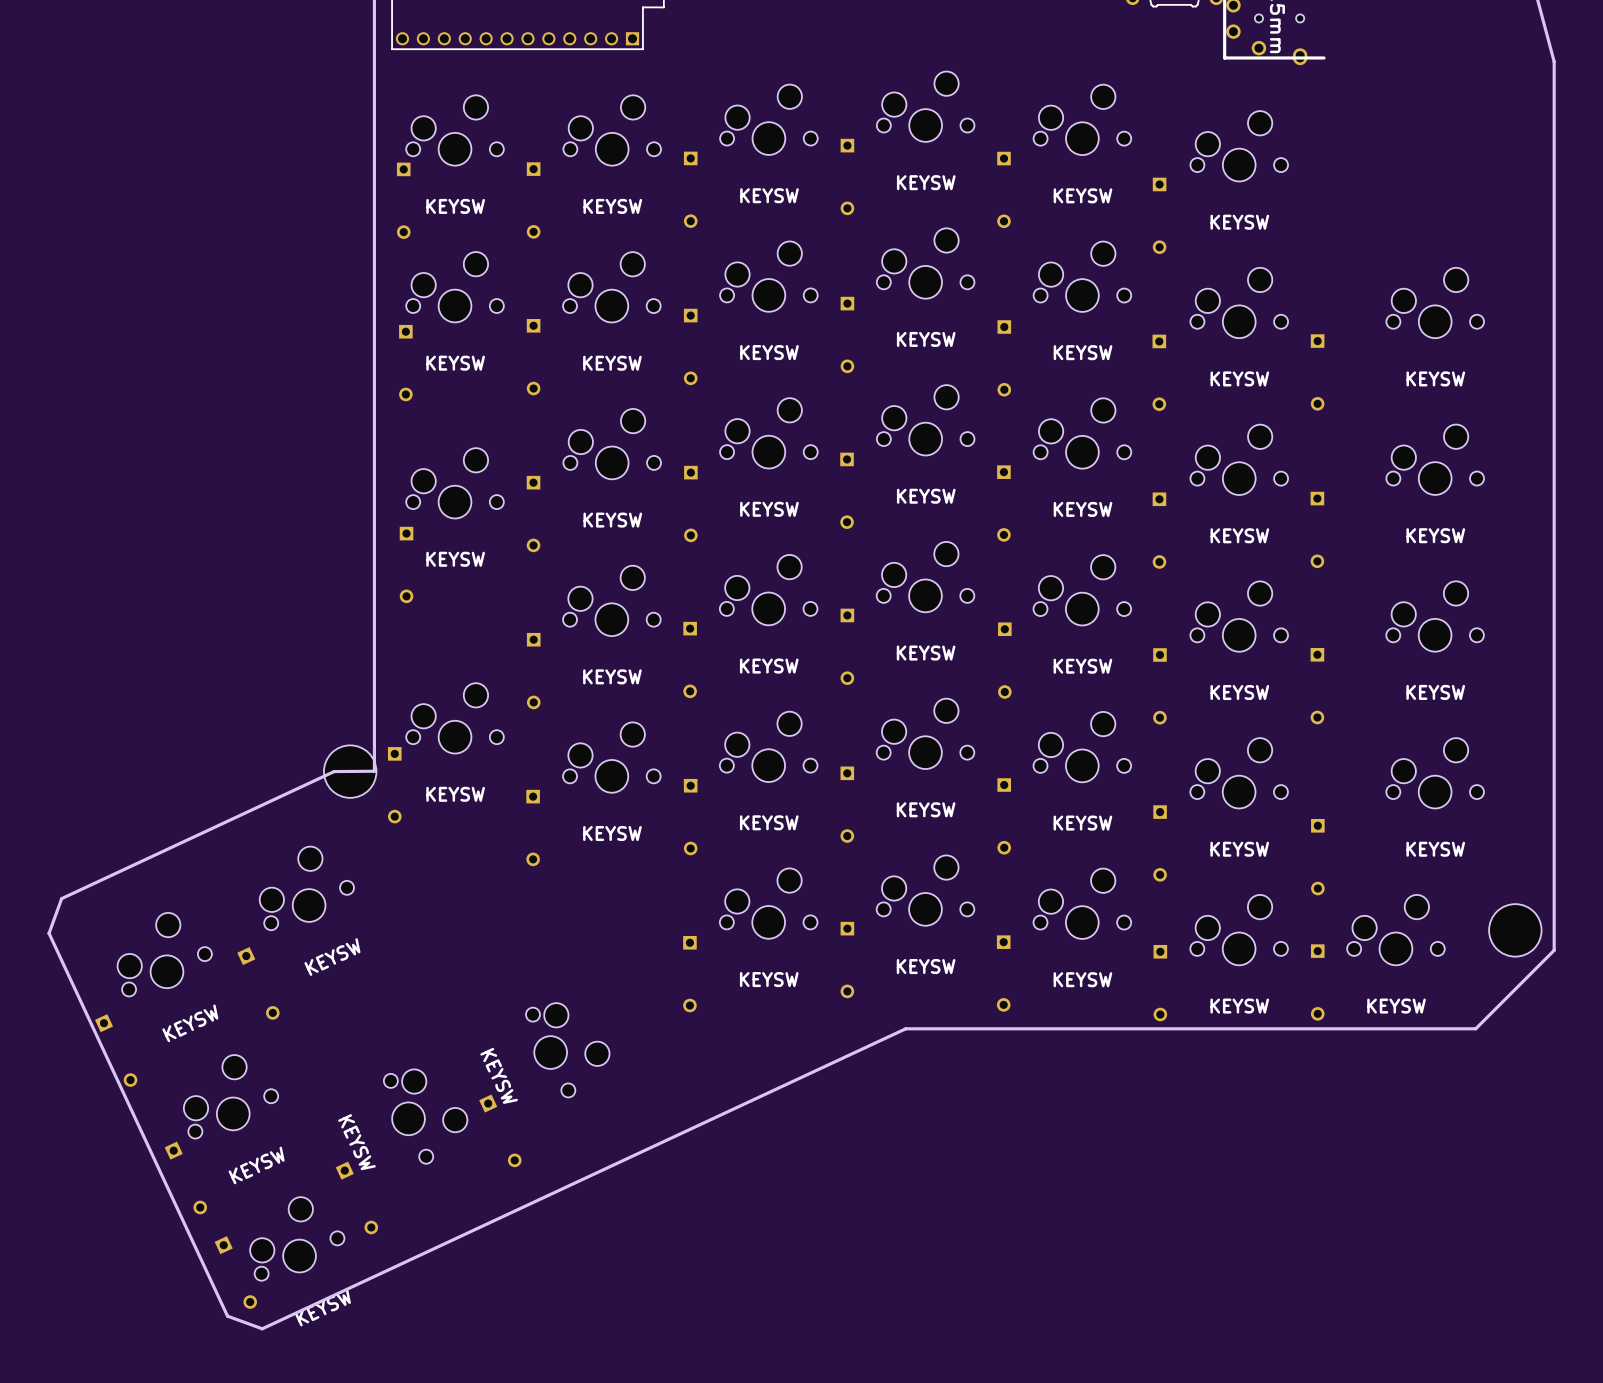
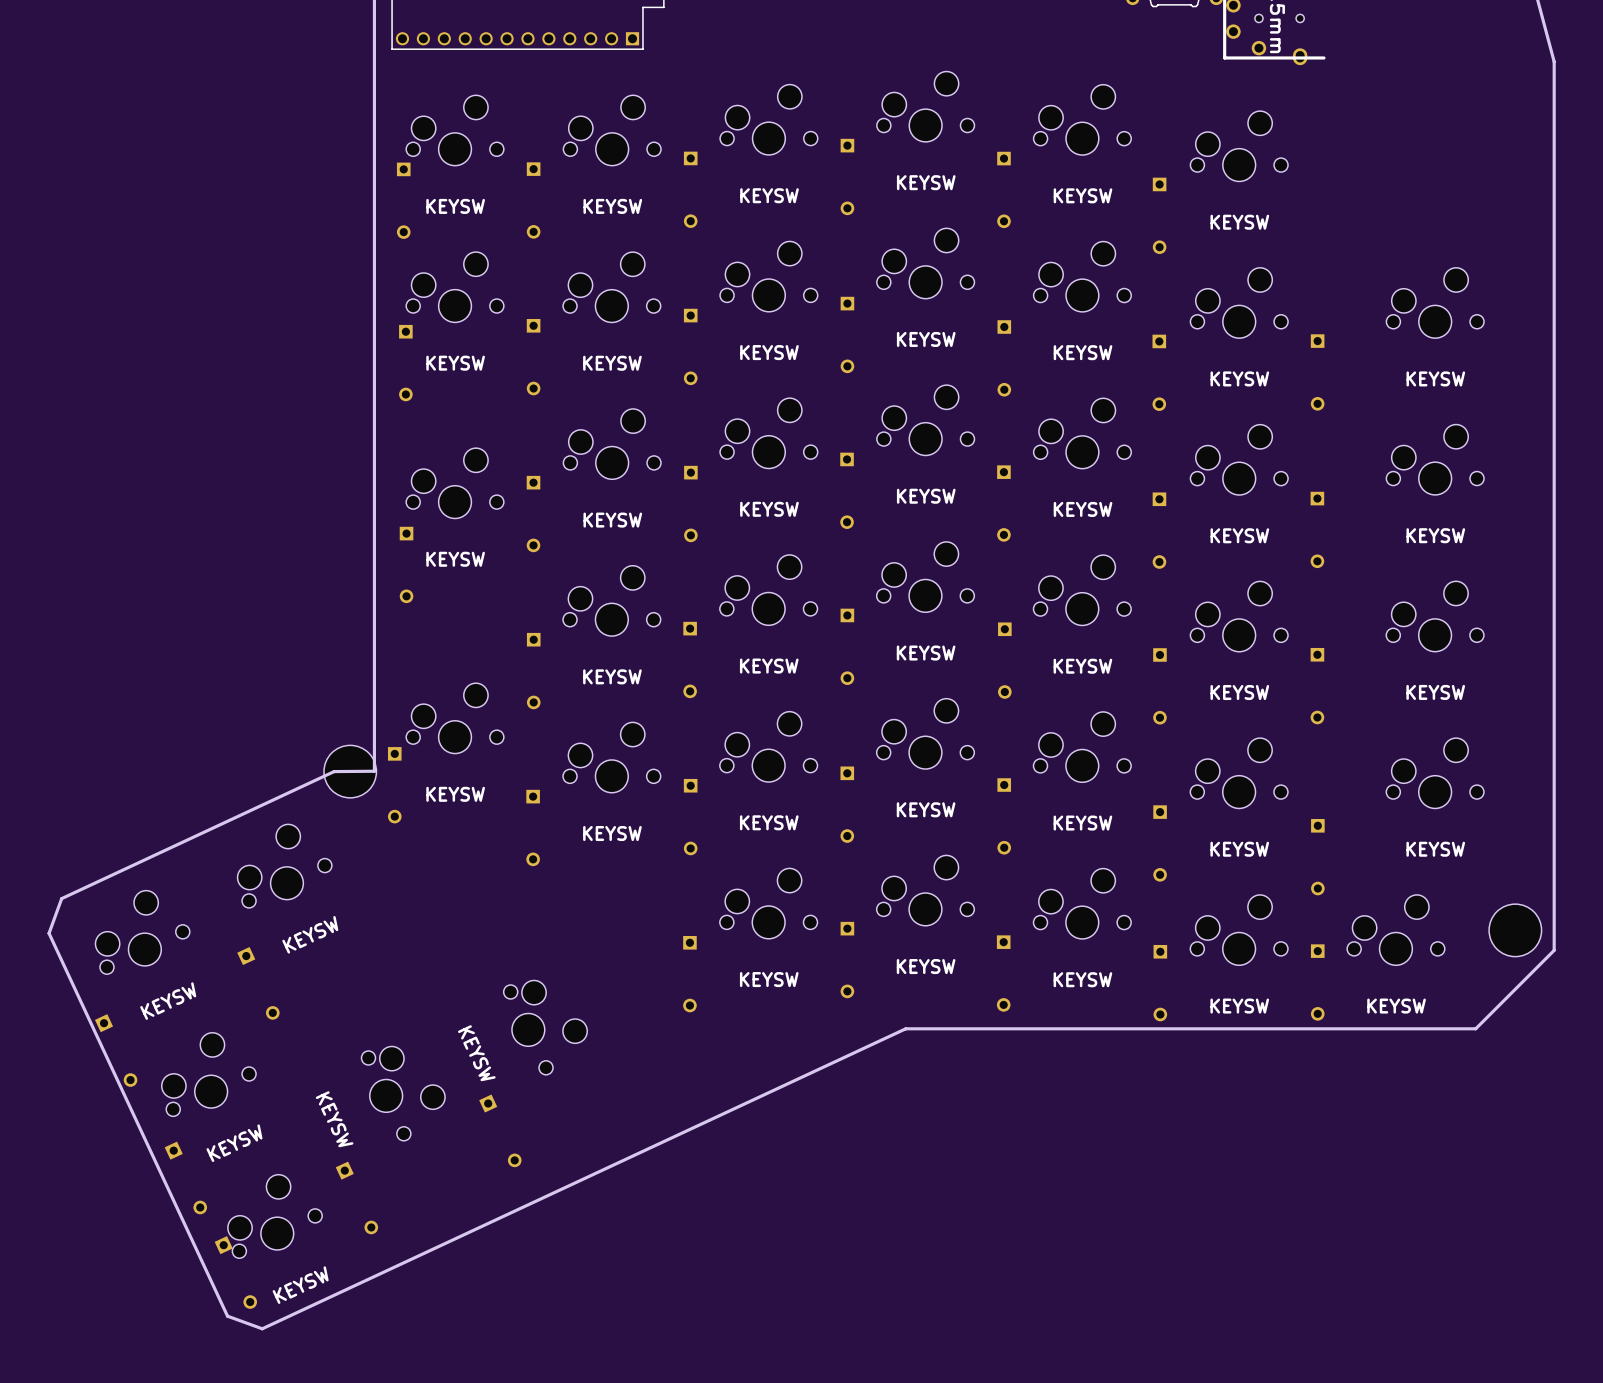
part position: (306, 888) -> (284, 866)
part position: (164, 954) -> (142, 932)
part position: (567, 1050) -> (545, 1027)
part position: (231, 1096) -> (208, 1074)
part position: (425, 1116) -> (403, 1093)
part position: (297, 1238) -> (275, 1216)

